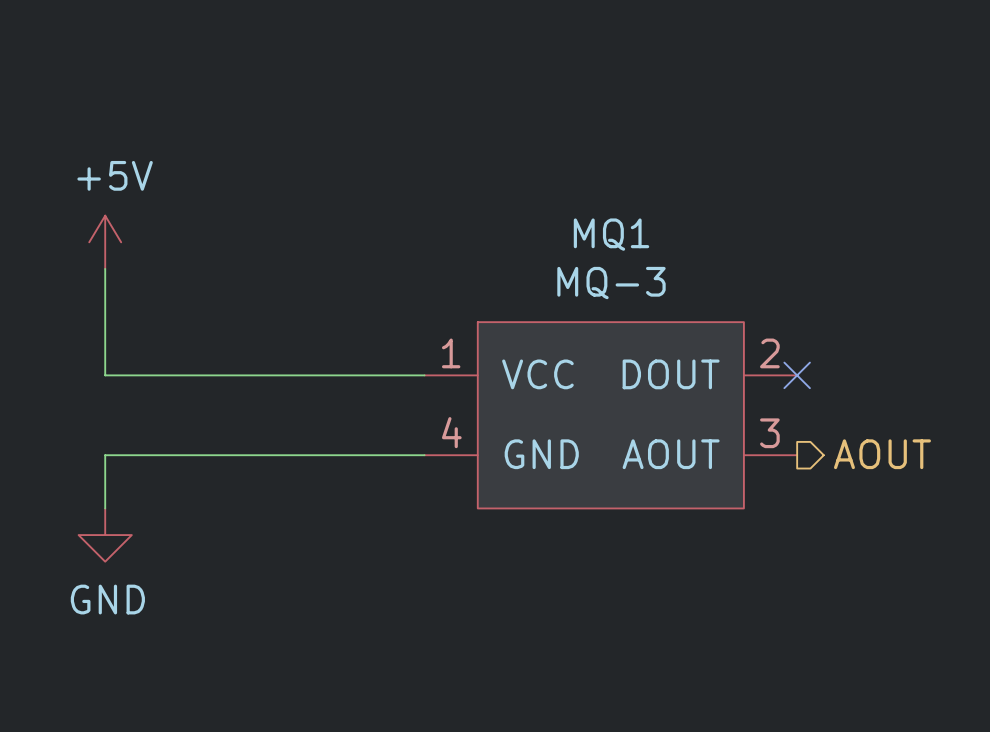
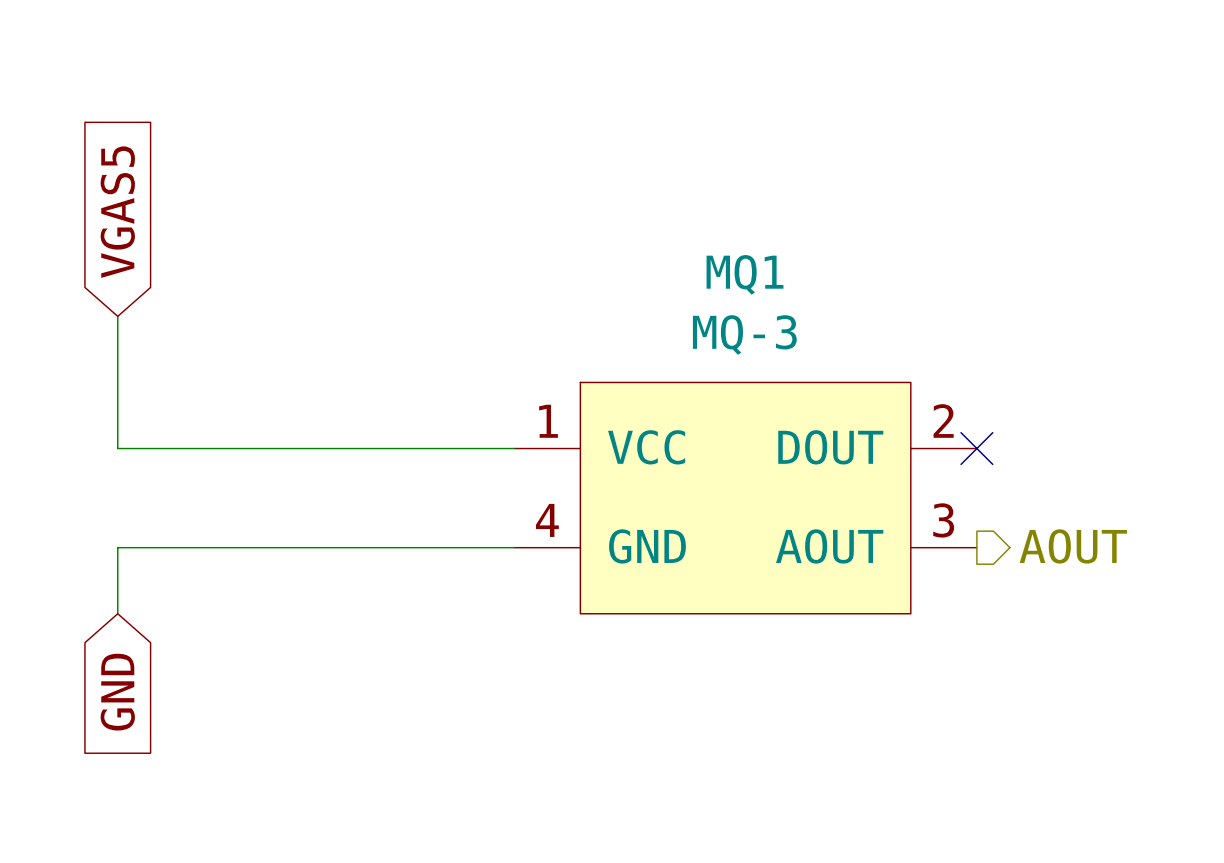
global label: none -> VGAS5 (117, 212)
power symbol: +5V (105, 242) -> none
power symbol: GND (105, 535) -> none
global label: none -> GND (117, 692)

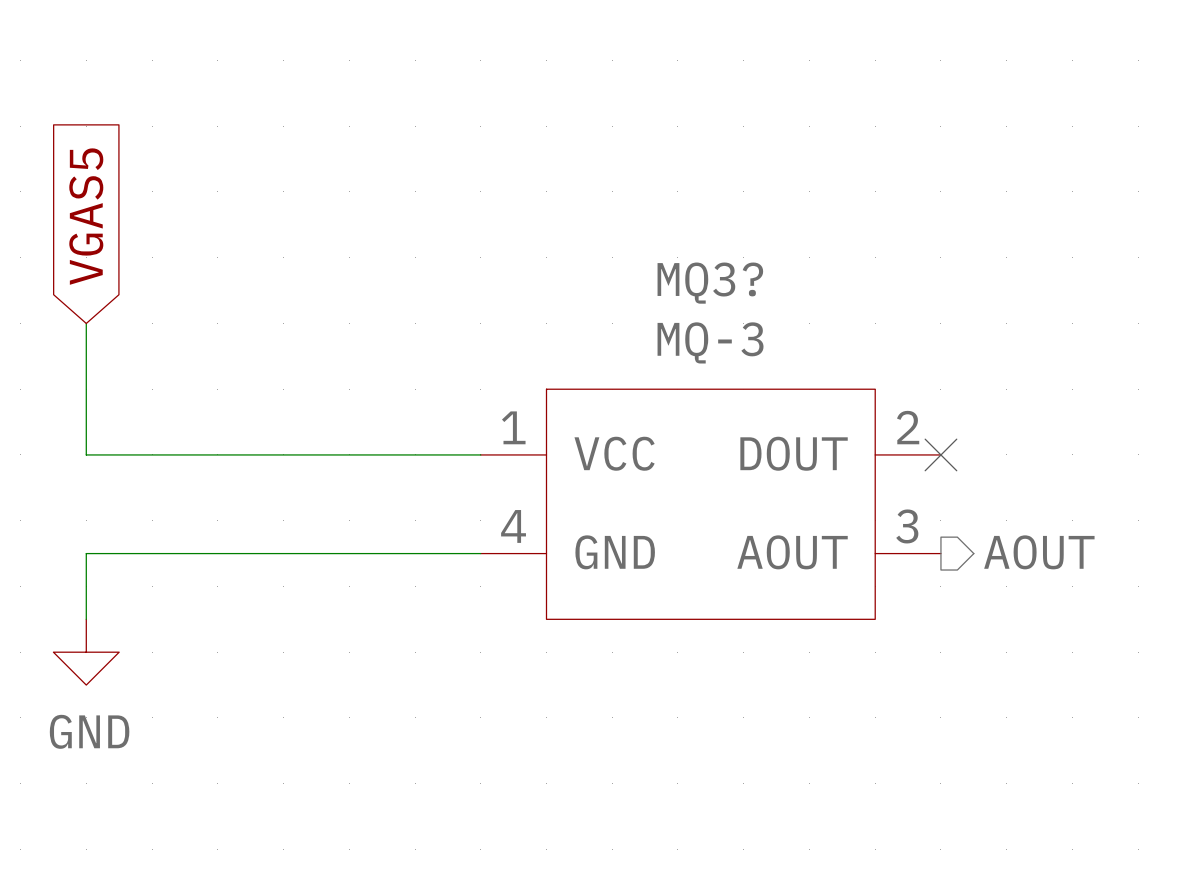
MQ1 name: MQ1 (745, 274) -> MQ3? (710, 283)
power symbol: none -> GND (86, 652)
global label: GND (117, 692) -> none

